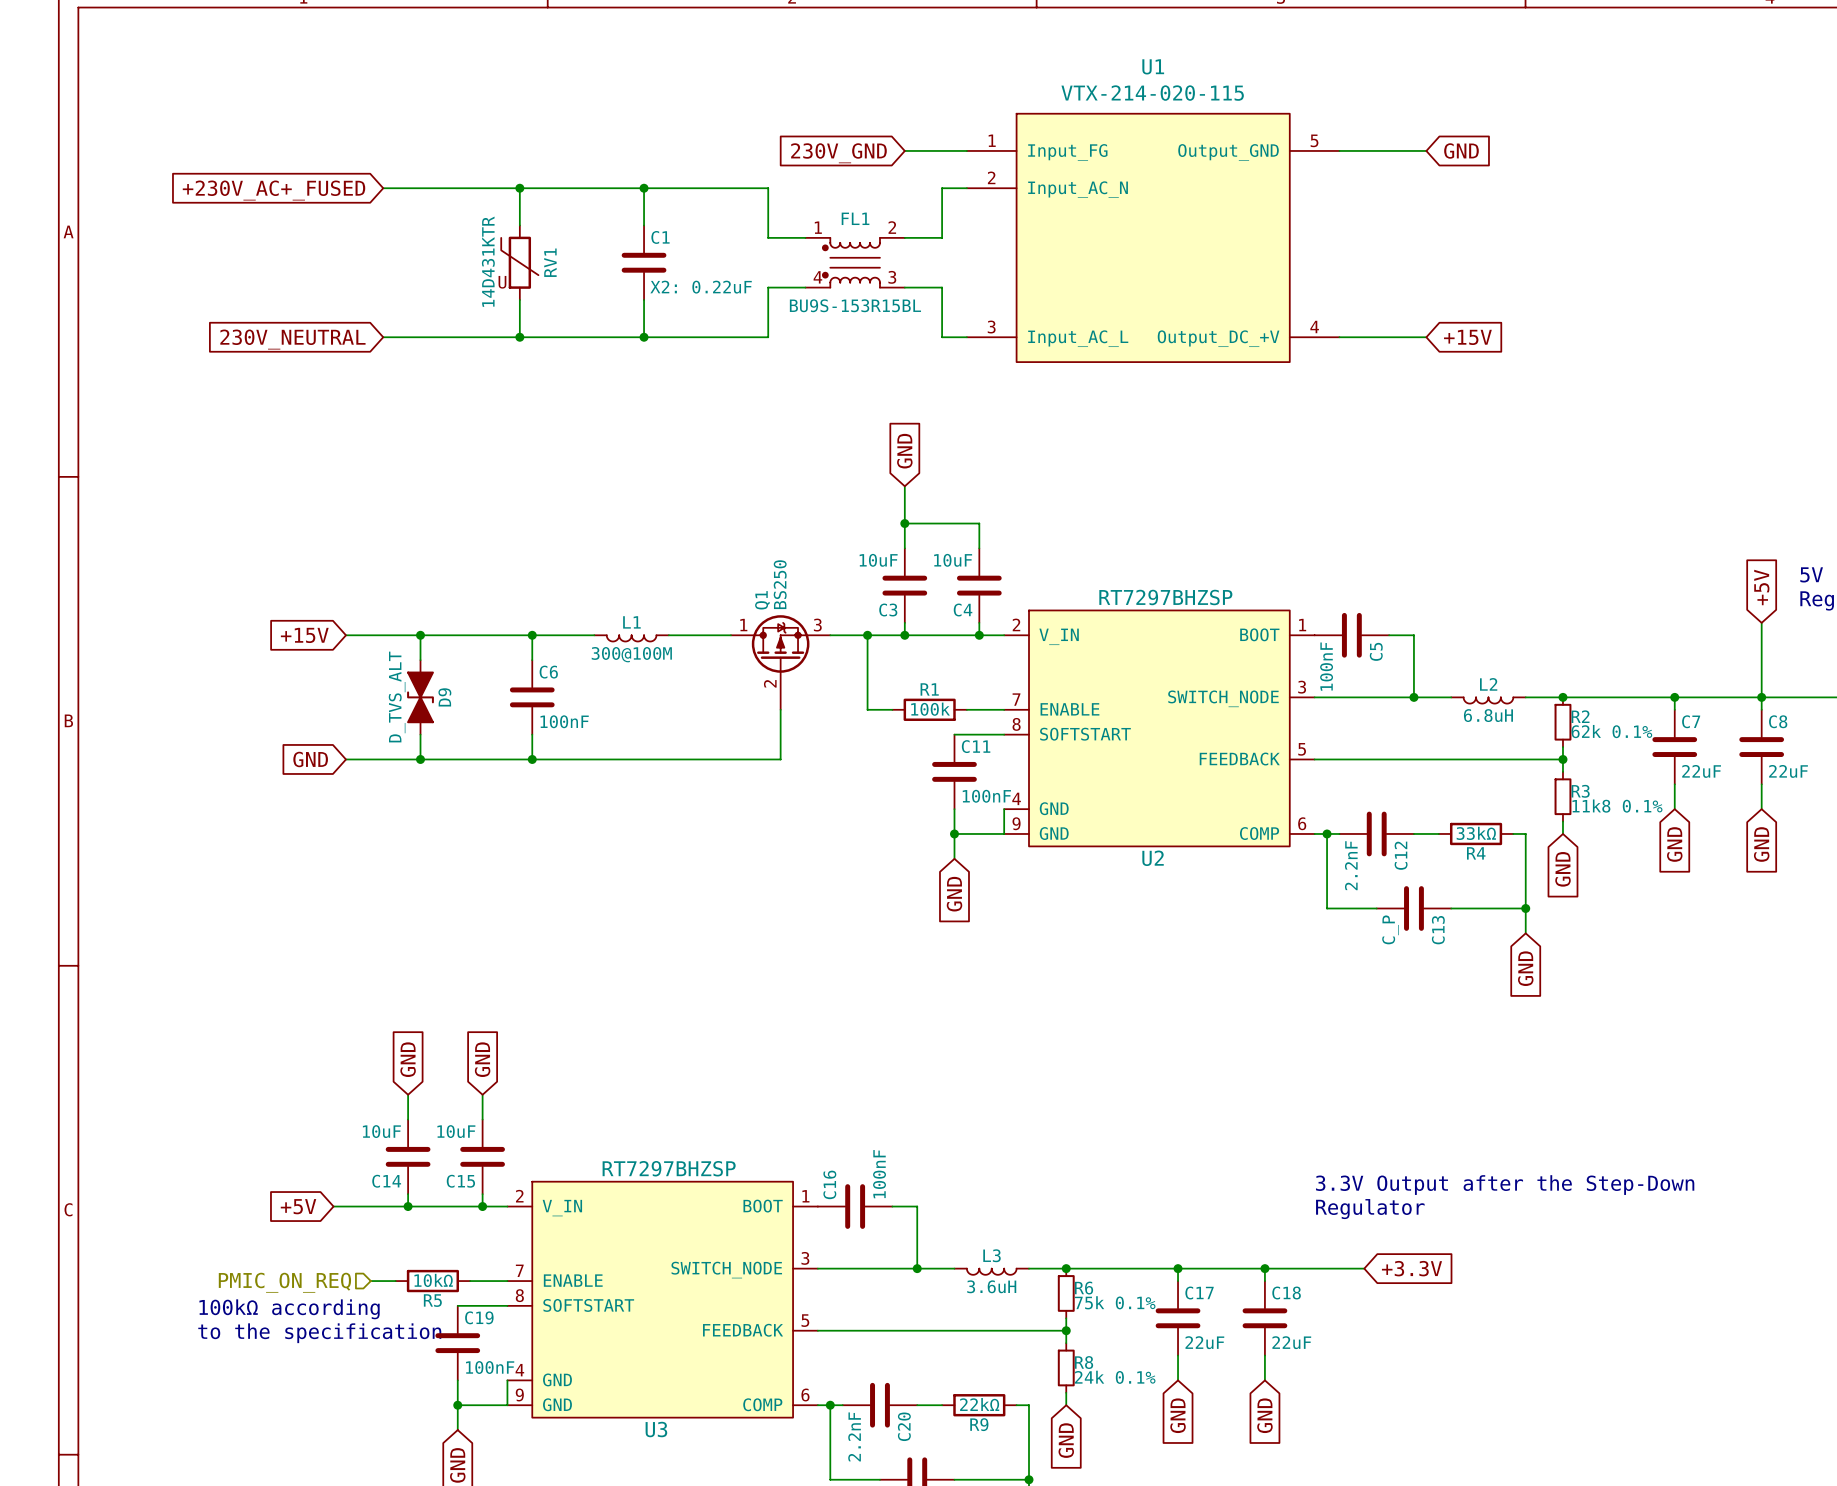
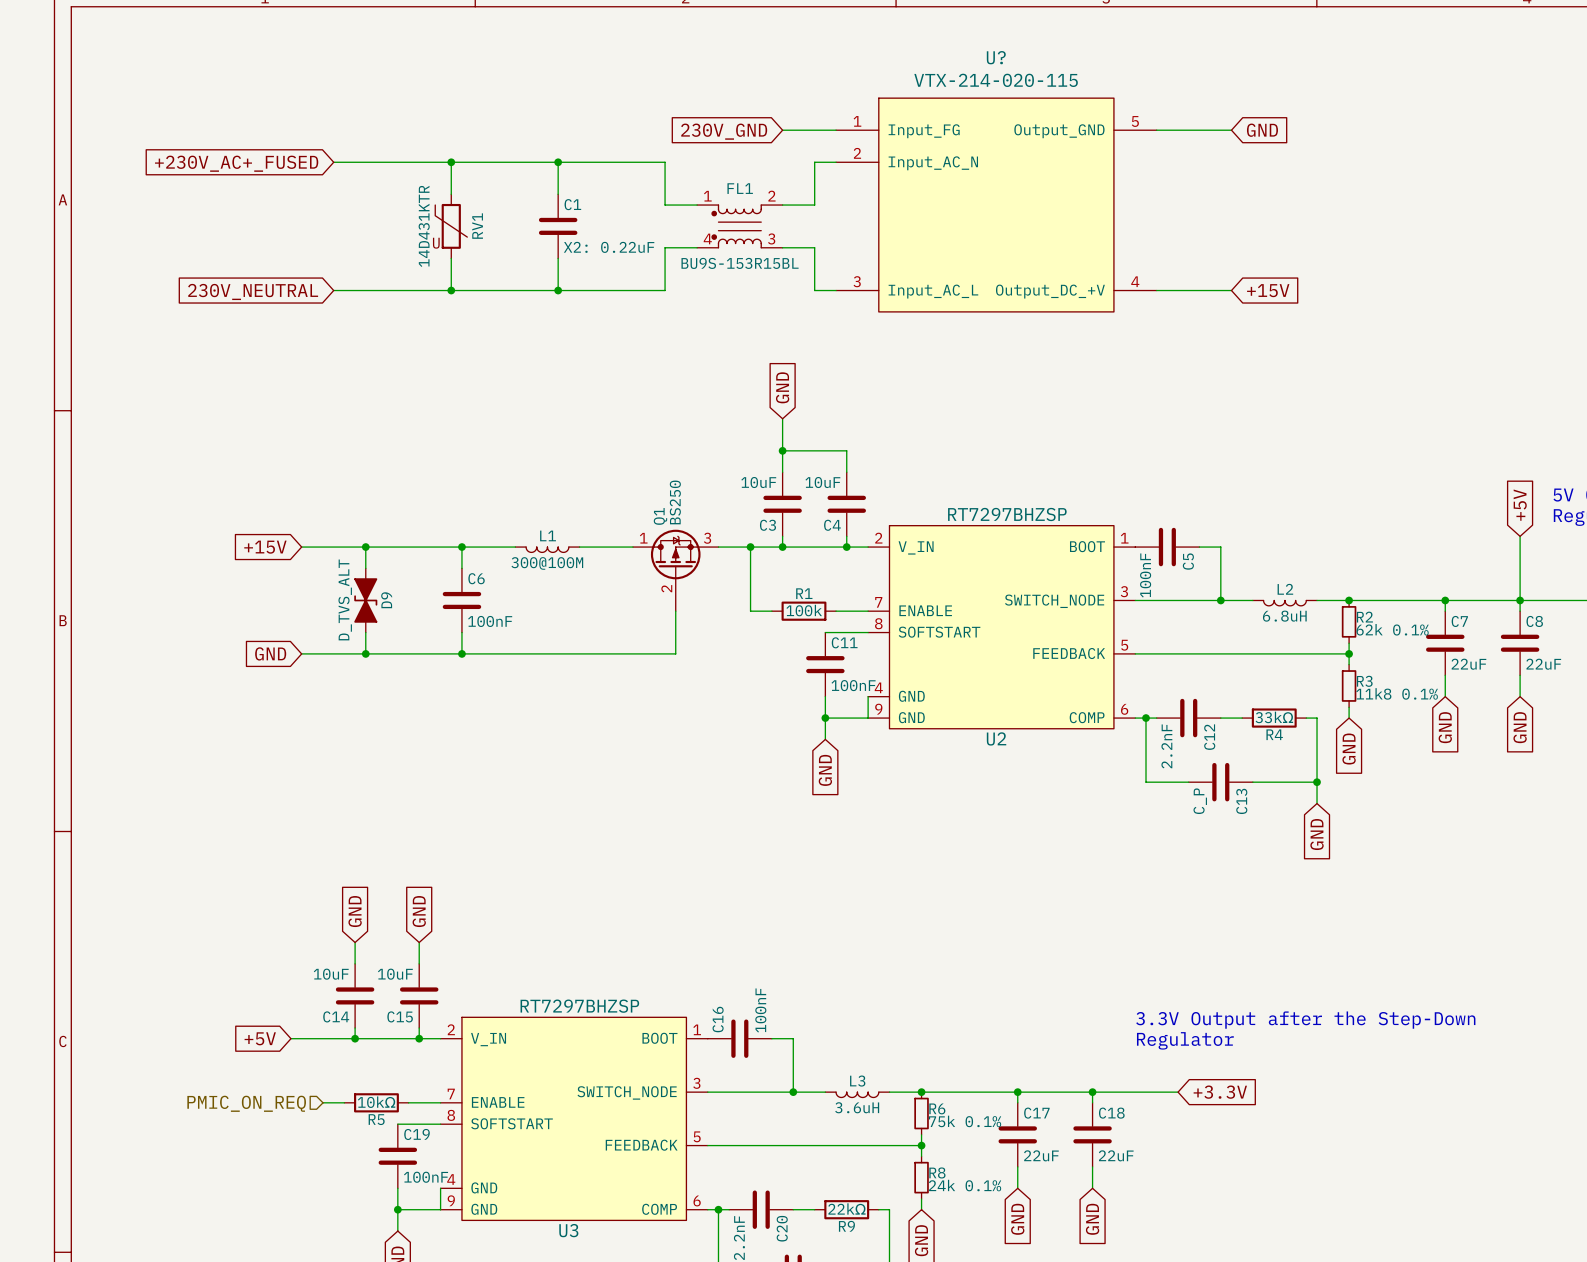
U1 name: U1 (1153, 66) -> U? (996, 57)
text: 100kΩ according (289, 1309) -> none
text: to the specification (319, 1333) -> none

